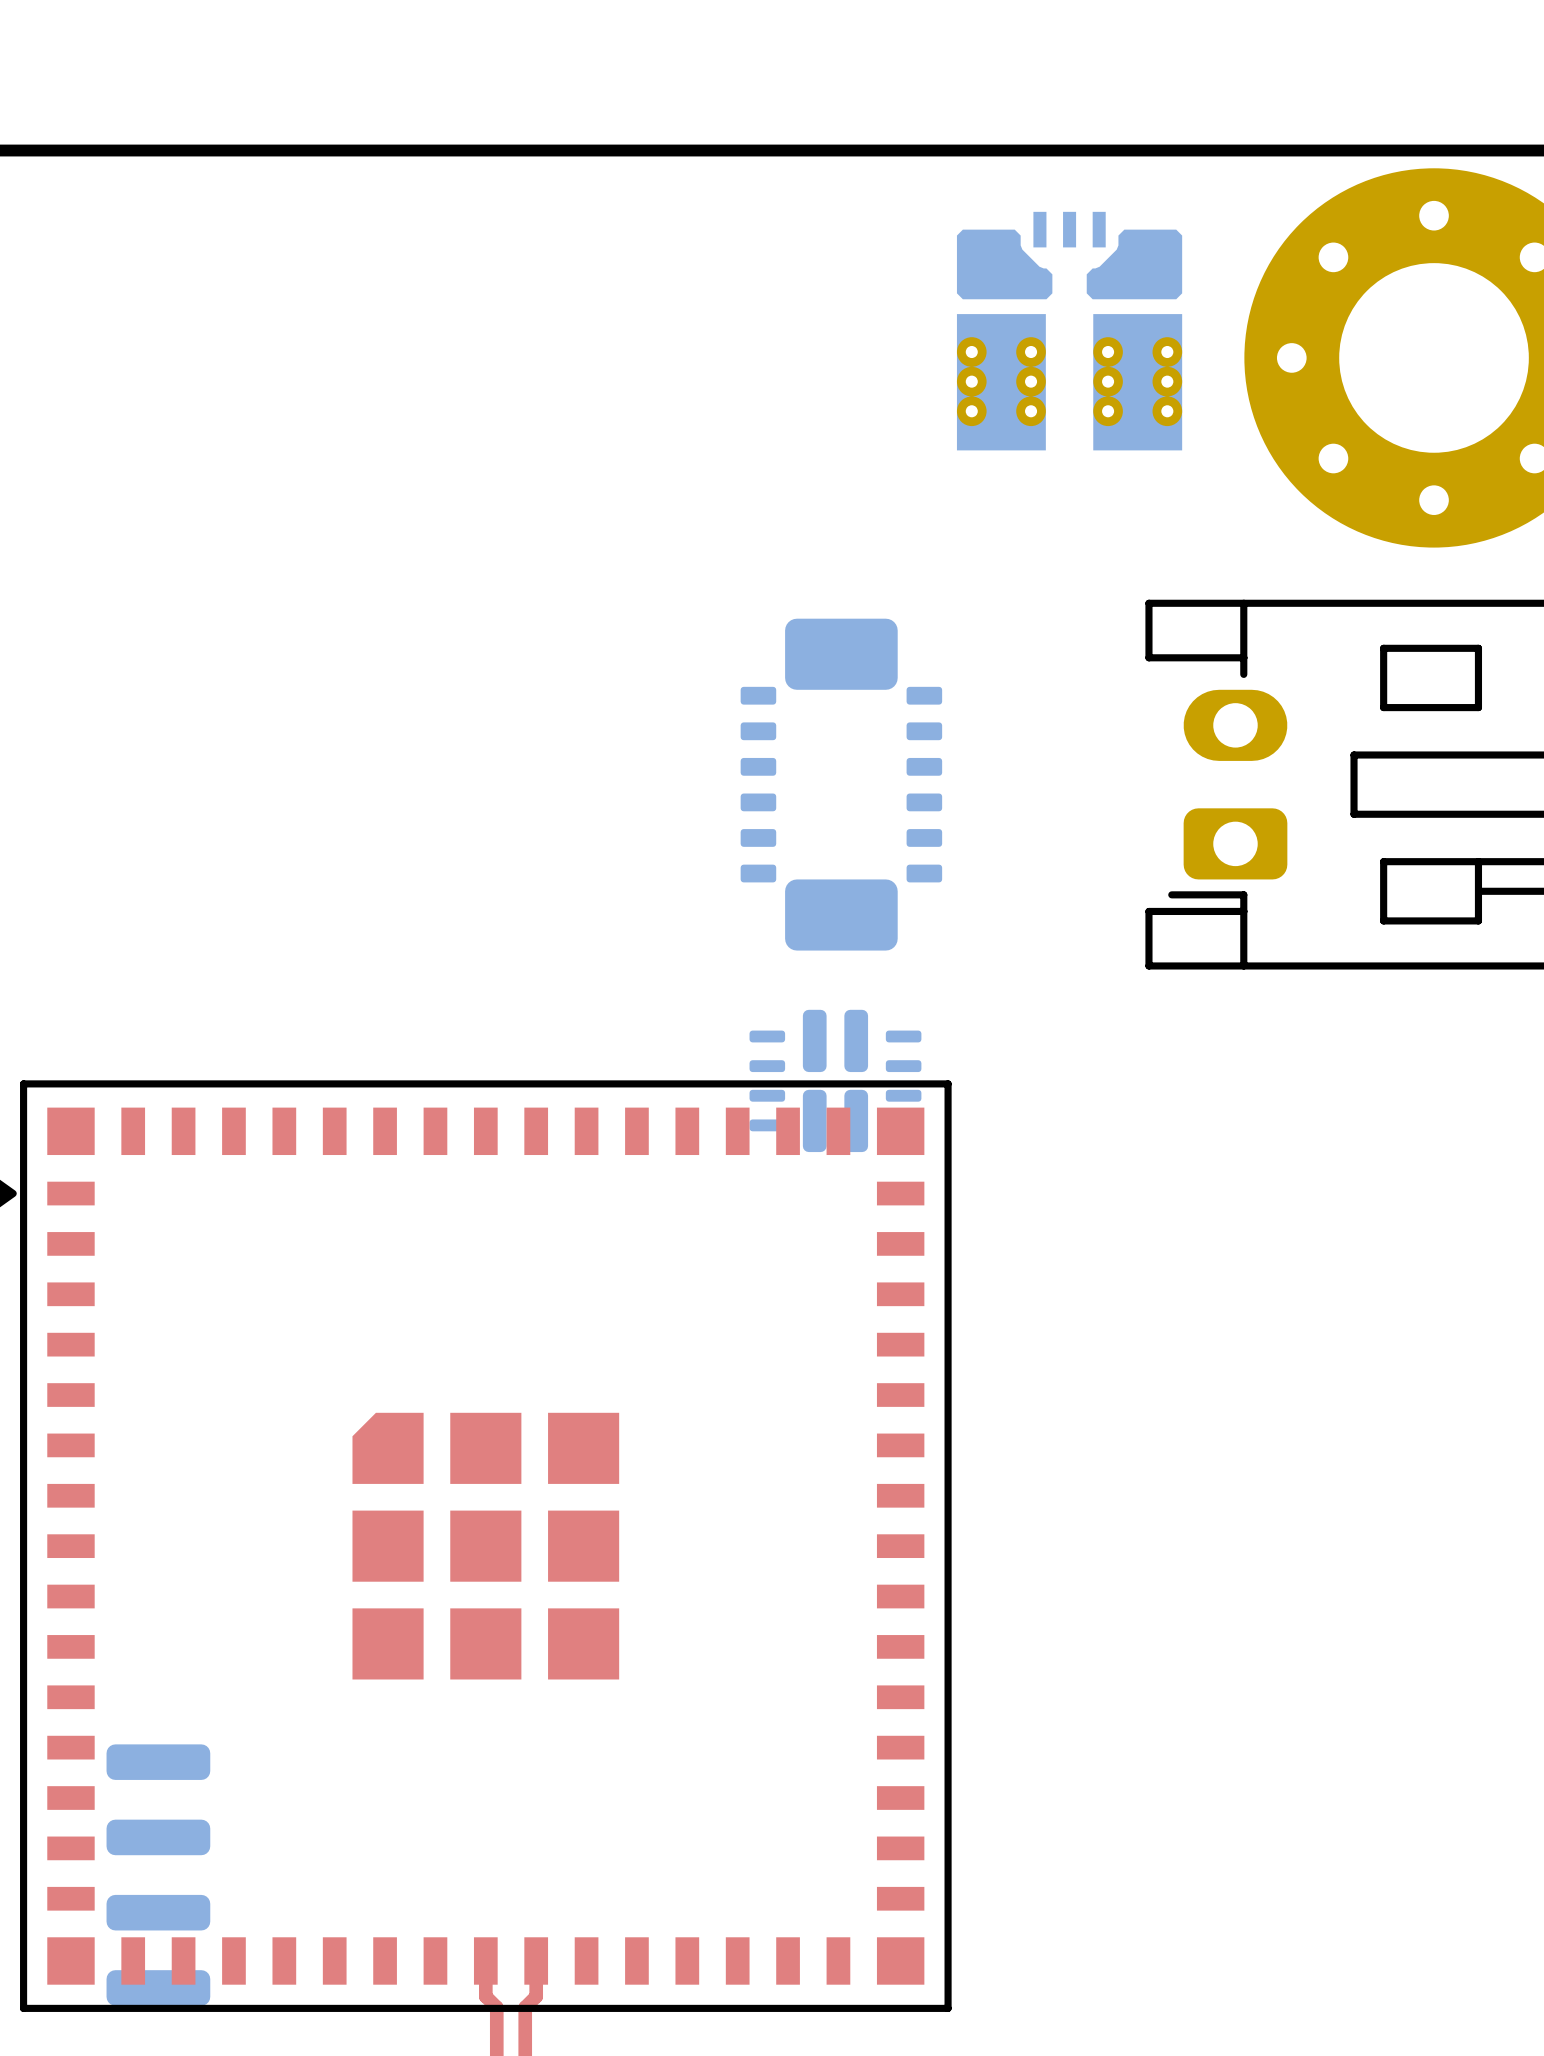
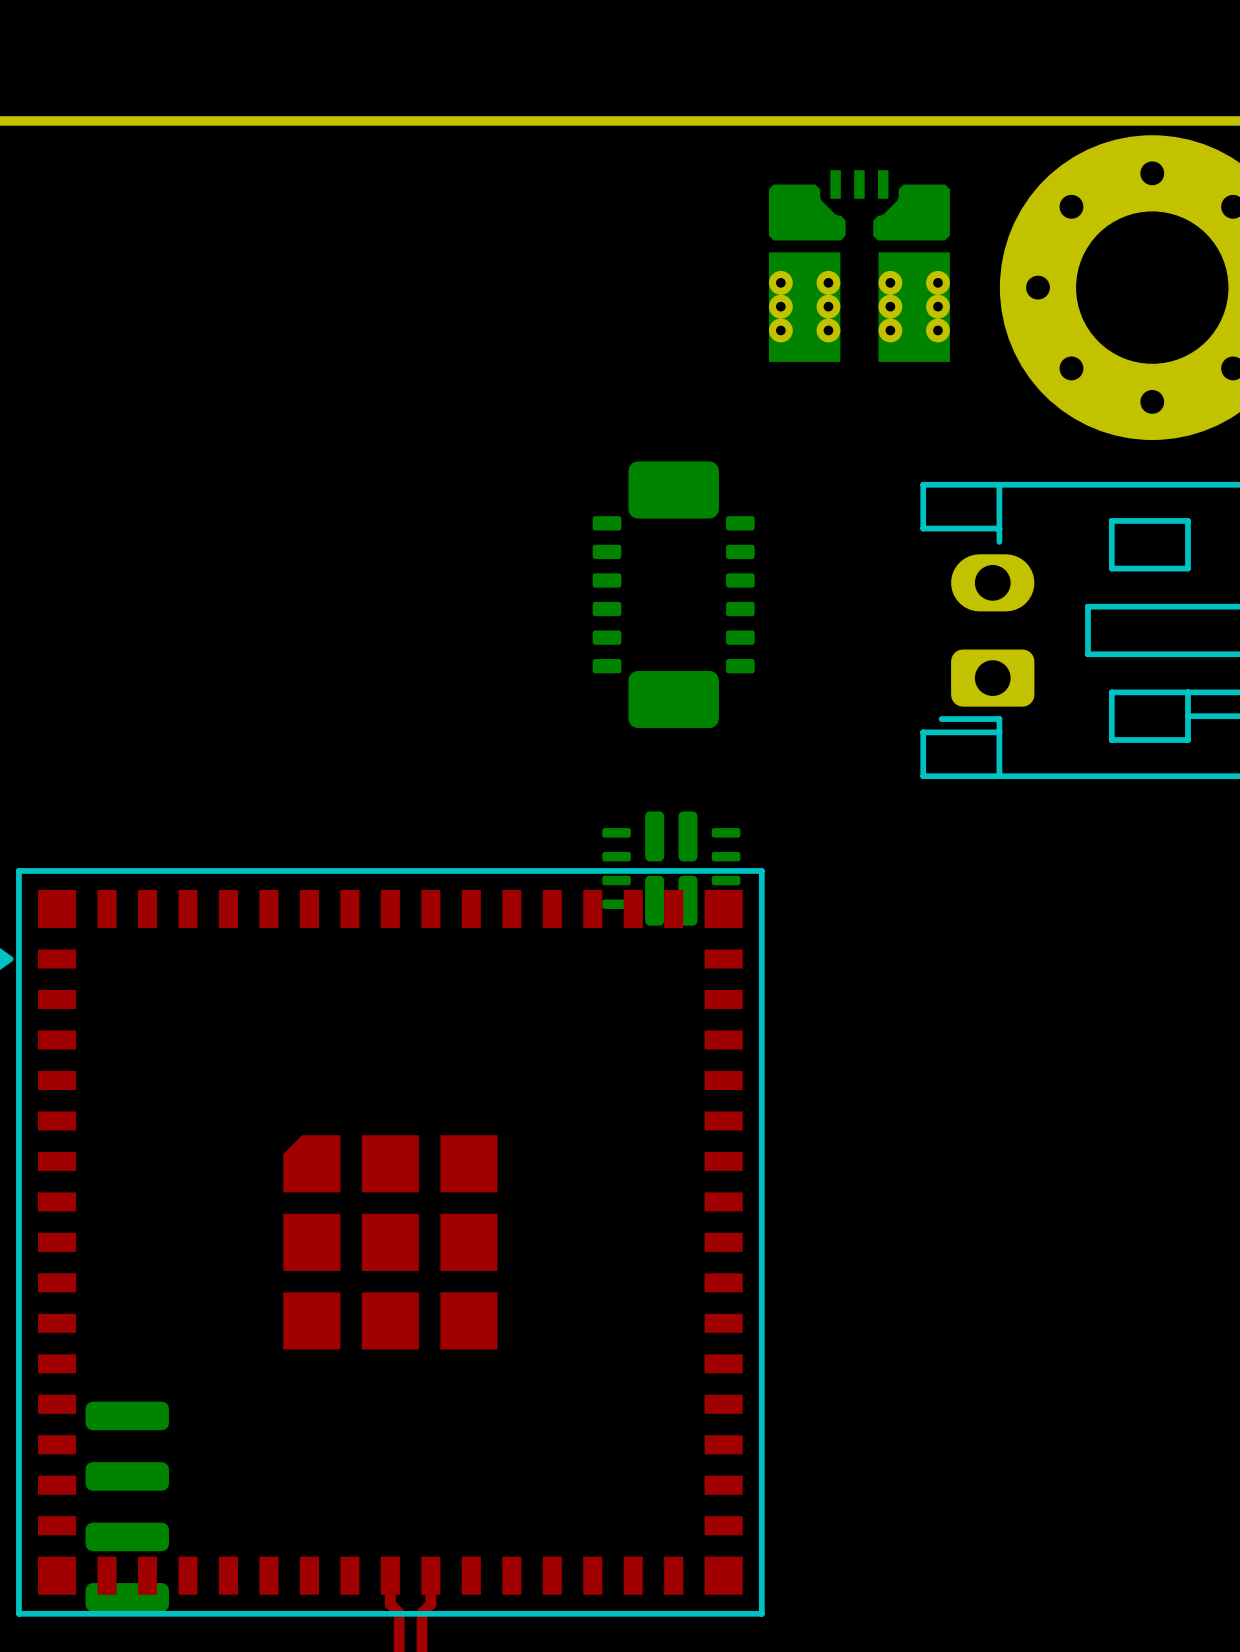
part position: (841, 784) -> (673, 594)

